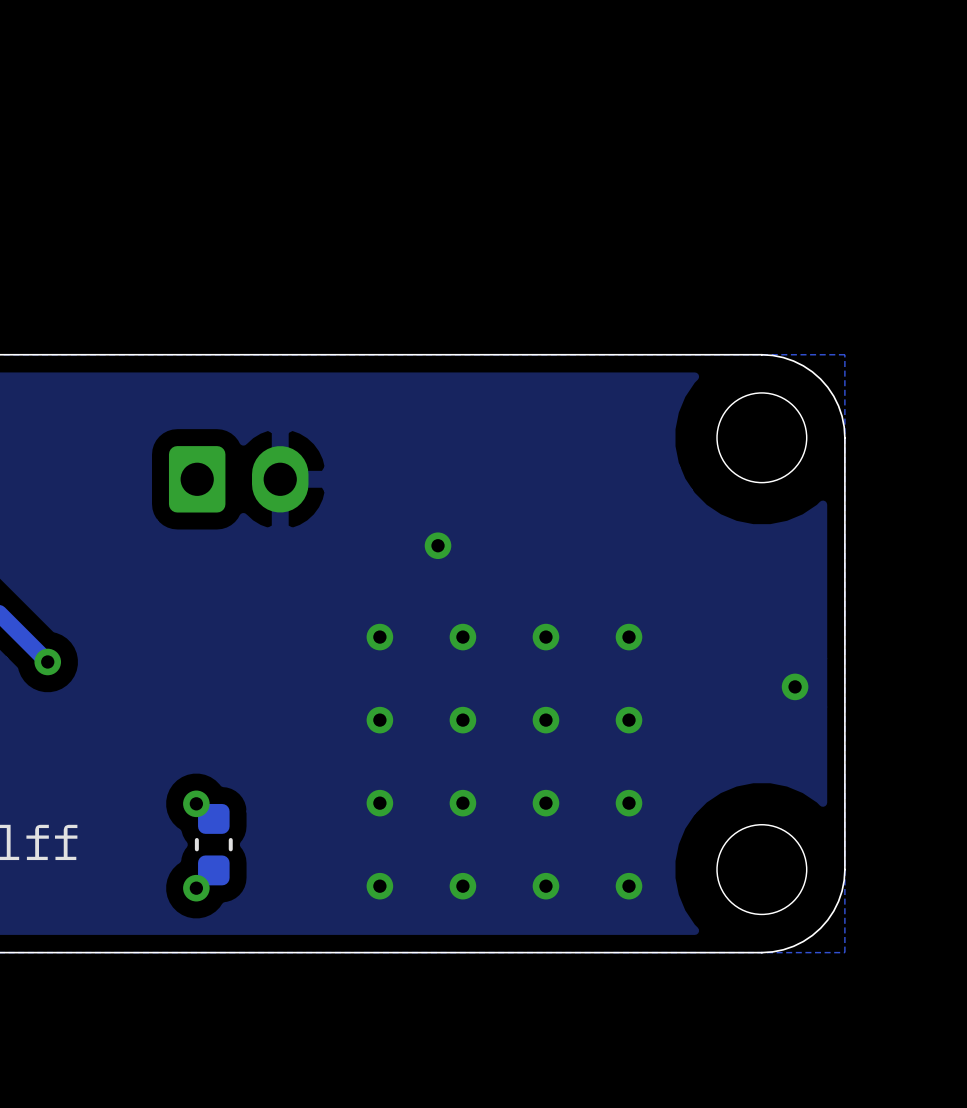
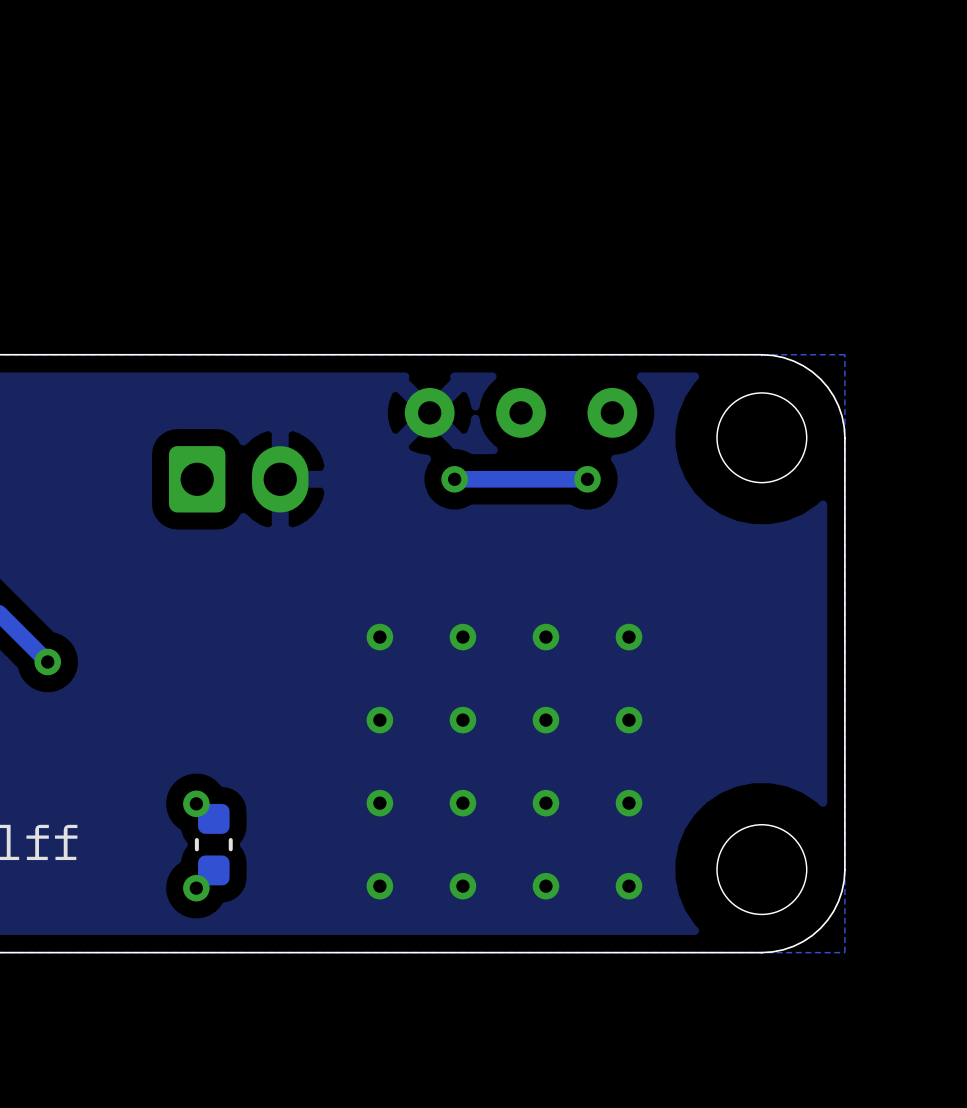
part: none -> (429, 412)
part: none -> (521, 412)
part: none -> (612, 412)
track: none -> (587, 479) (454, 479)
via: none -> (587, 479)
via position: (438, 545) -> (454, 479)
via: (795, 686) -> none

